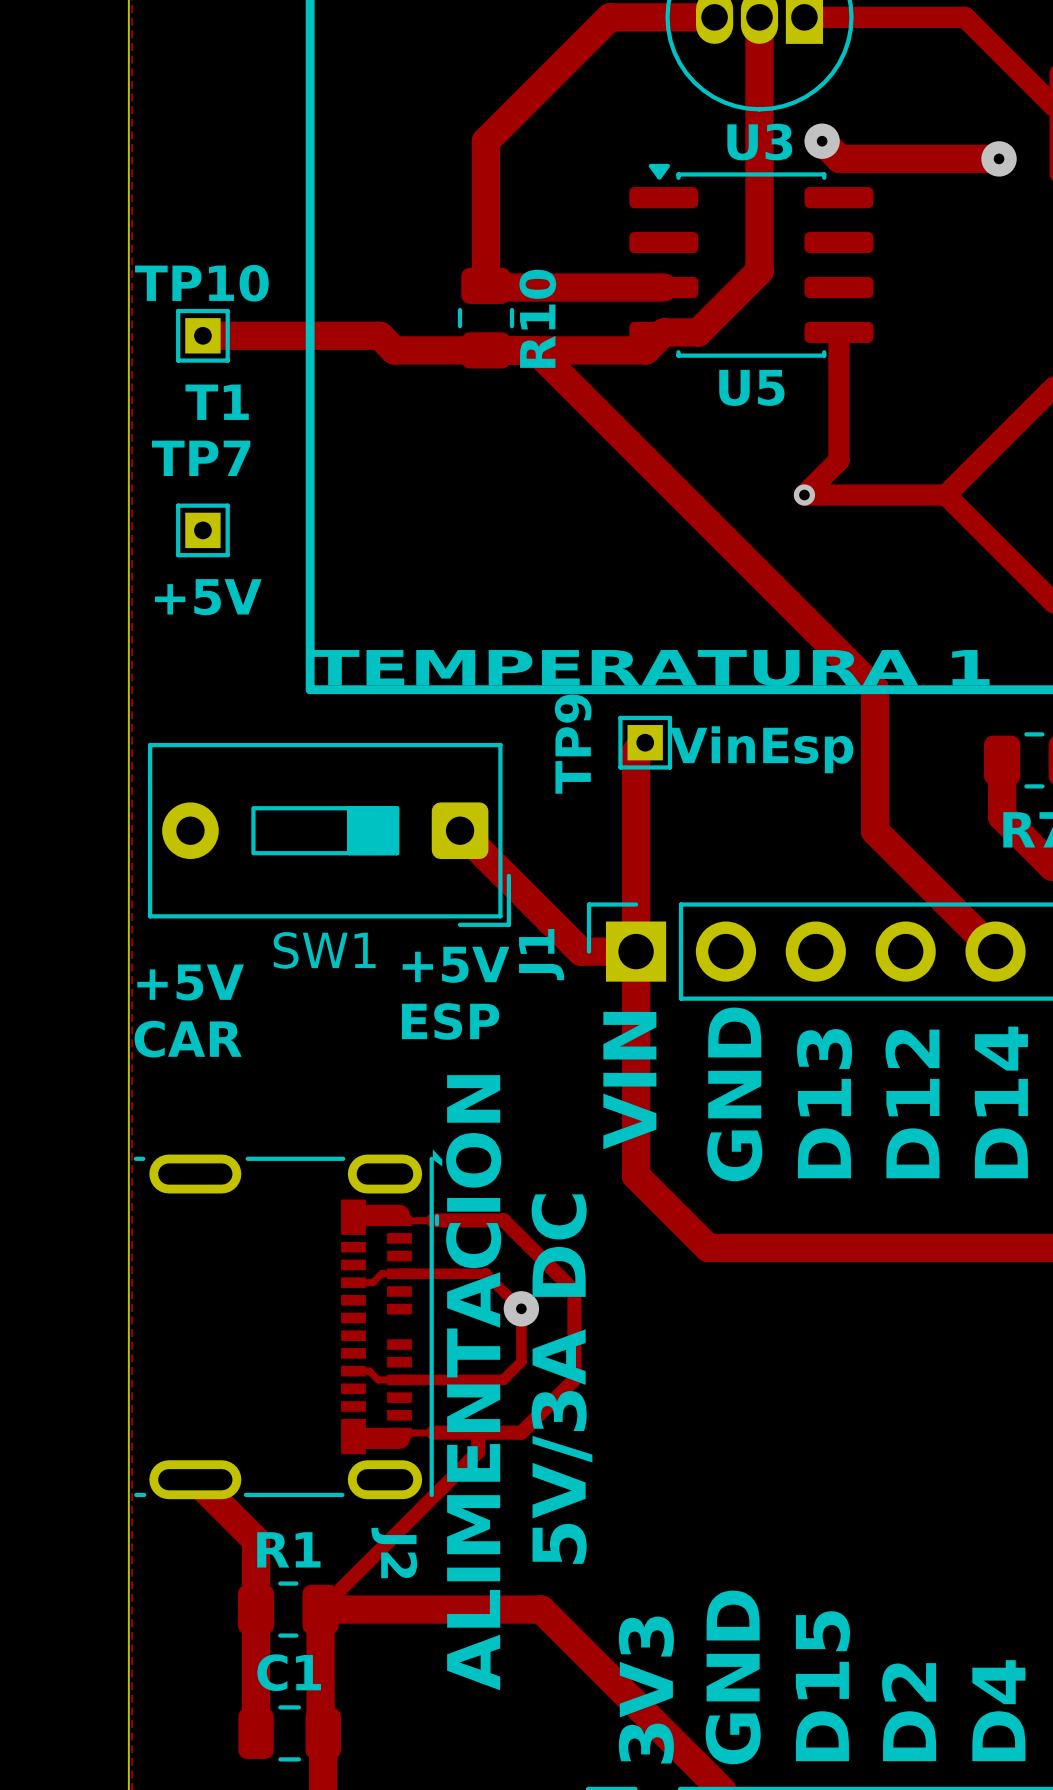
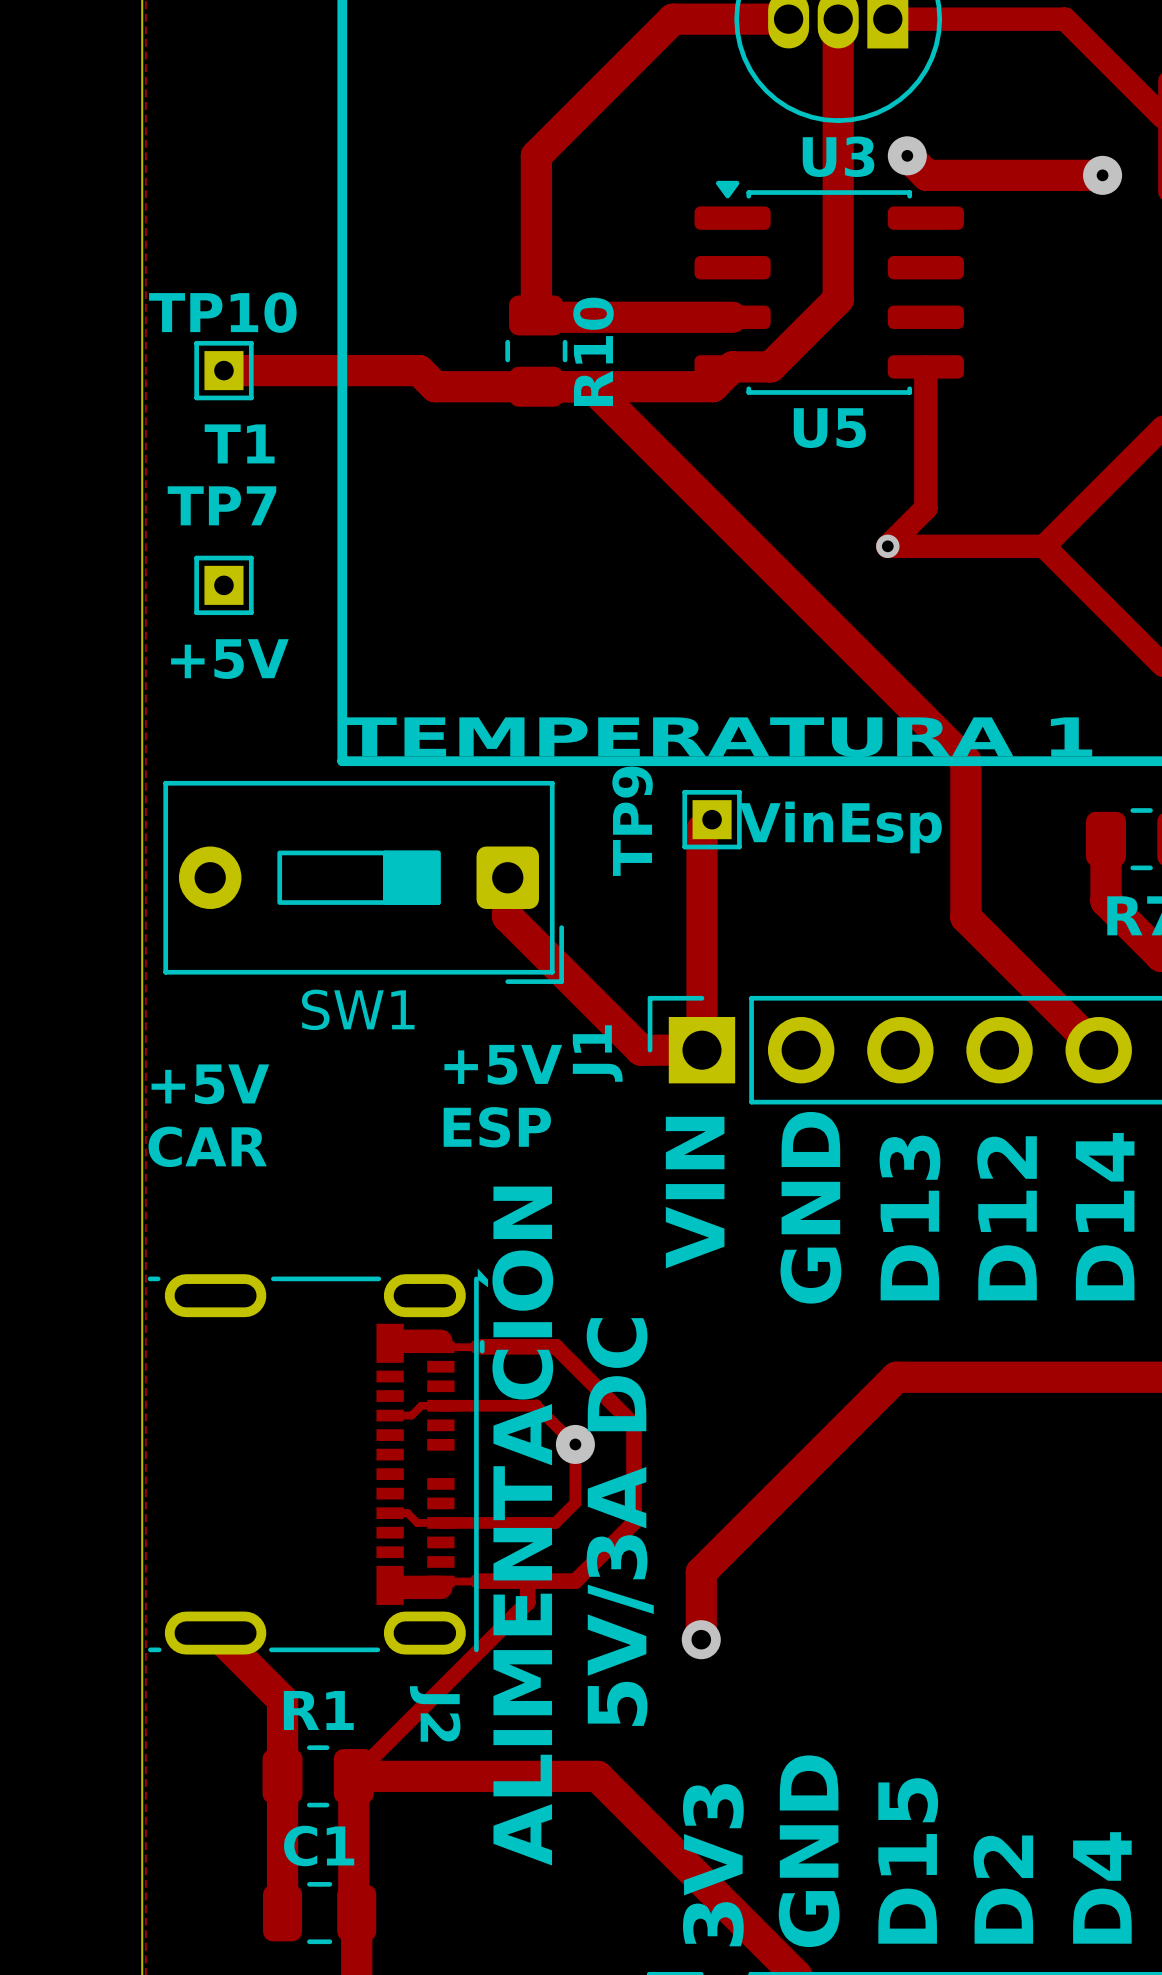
SW1 position: (329, 834) -> (363, 882)
track: (636, 951) (636, 1175) (708, 1247) (812, 1247) -> (701, 1639) (701, 1572) (896, 1377)
via: none -> (701, 1639)

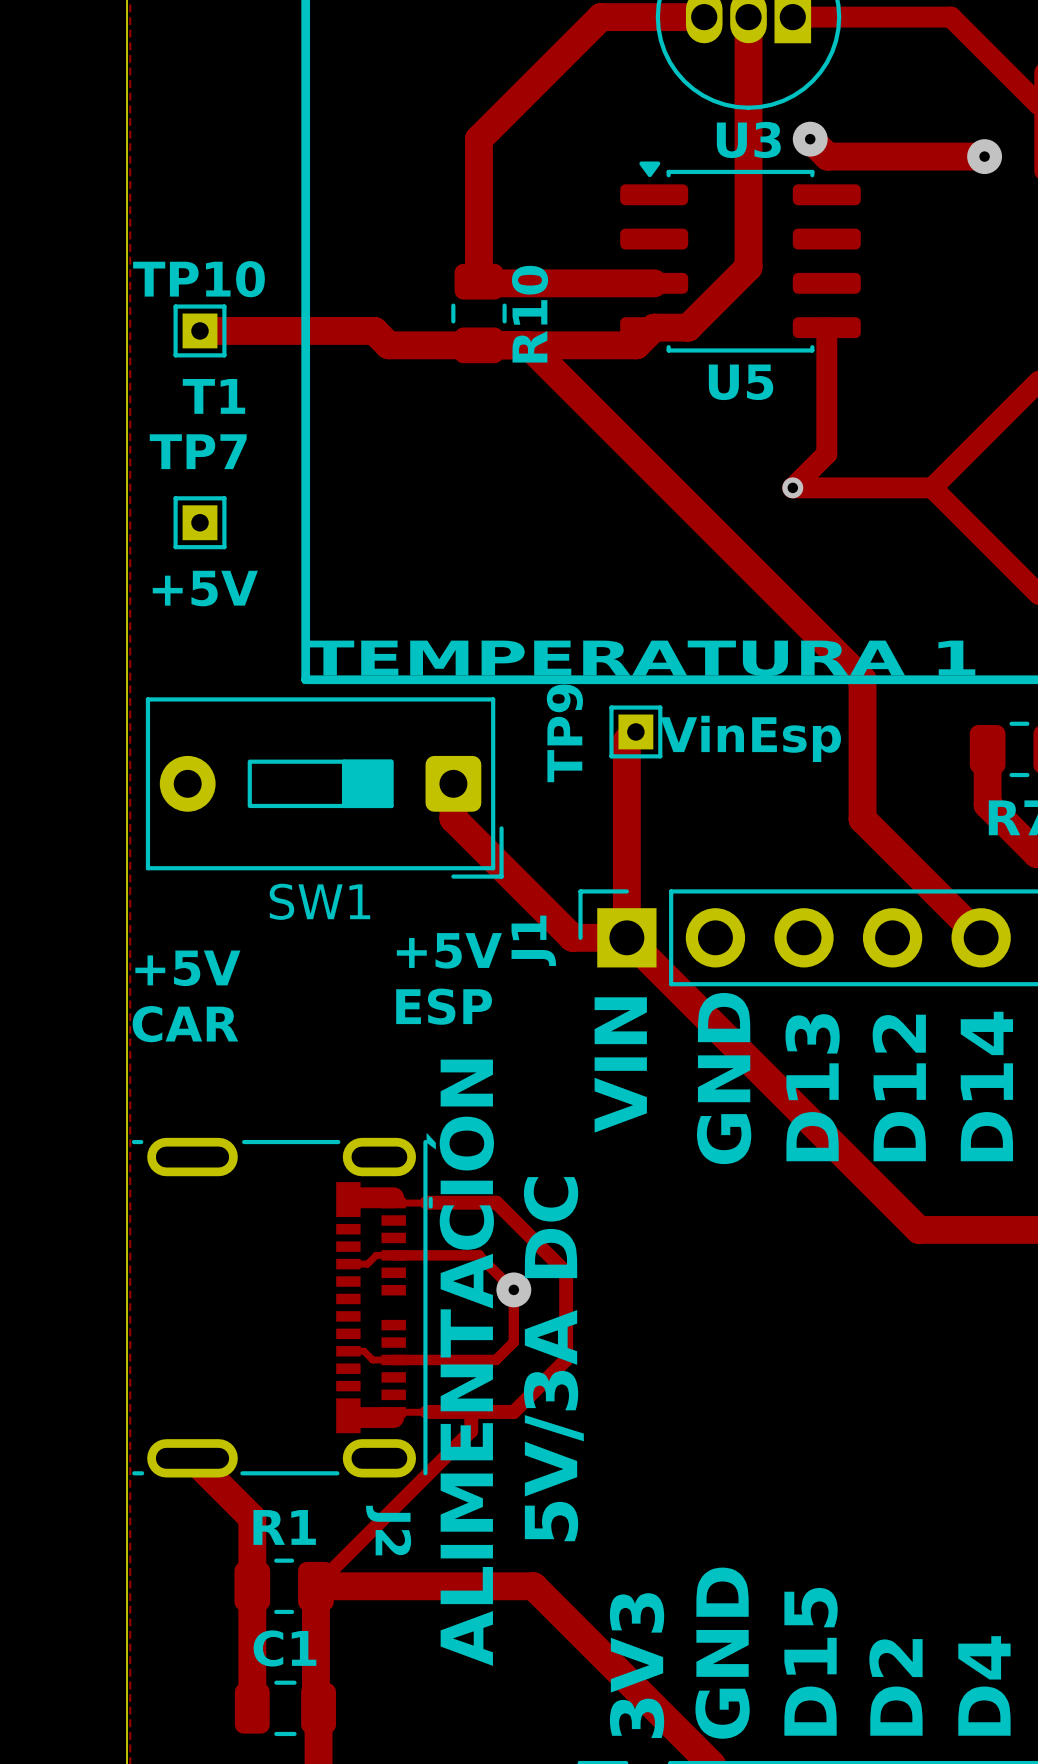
track: (1029, 1377) (896, 1377) (701, 1572) (701, 1639) -> (918, 1229) (626, 937)
via: (701, 1639) -> none

